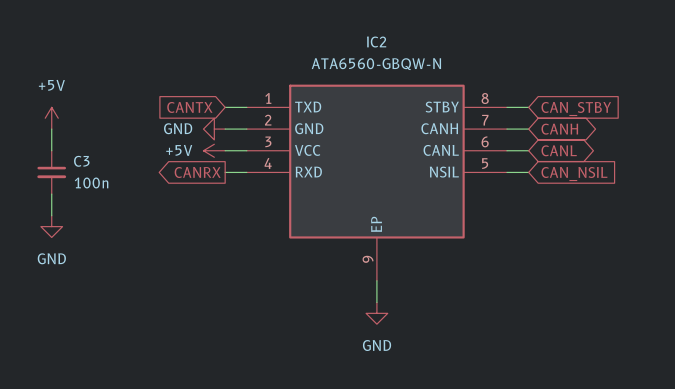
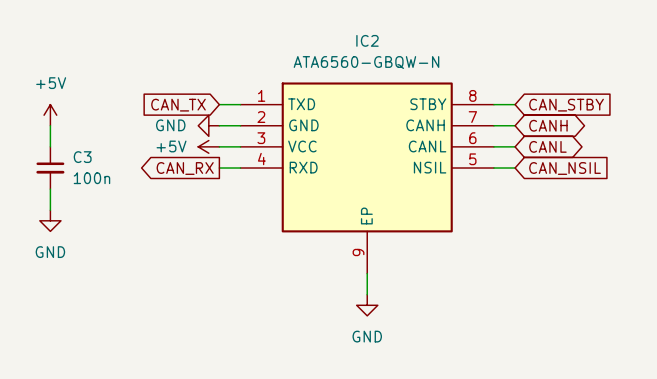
global label: CANTX (189, 107) -> CAN_TX (178, 105)
global label: CANRX (197, 172) -> CAN_RX (185, 168)

